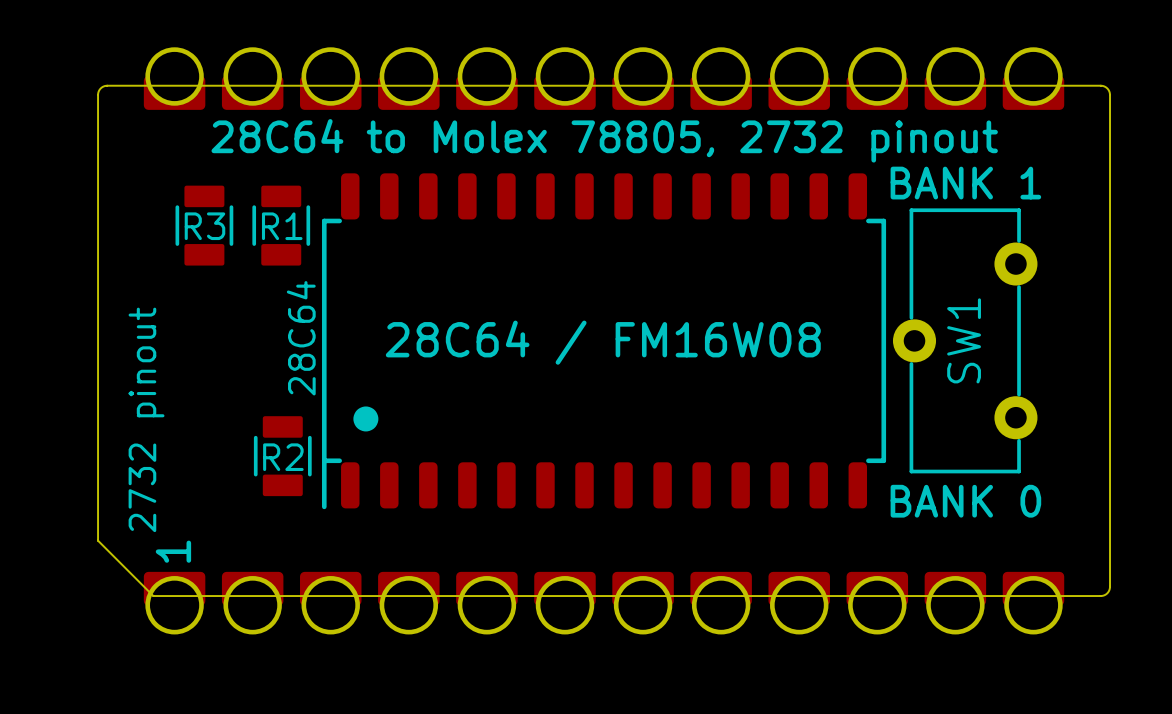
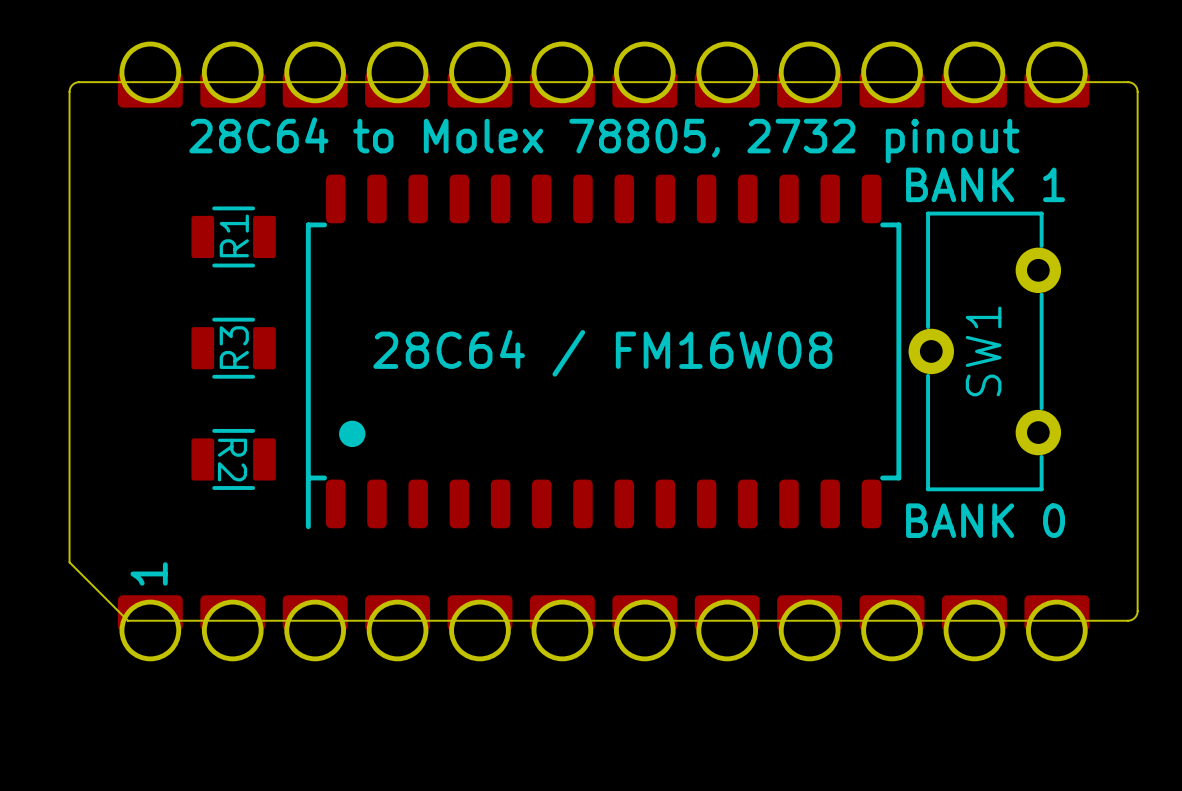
R3 rotation: 0° (204, 225) -> 90° clockwise (233, 348)
R3 position: (204, 225) -> (233, 348)
R1 rotation: 0° (281, 225) -> 90° clockwise (233, 236)
text: 28C64 (301, 338) -> none
text: 2732 pinout (146, 419) -> none
R2 rotation: 0° (282, 456) -> 90° clockwise (233, 459)

